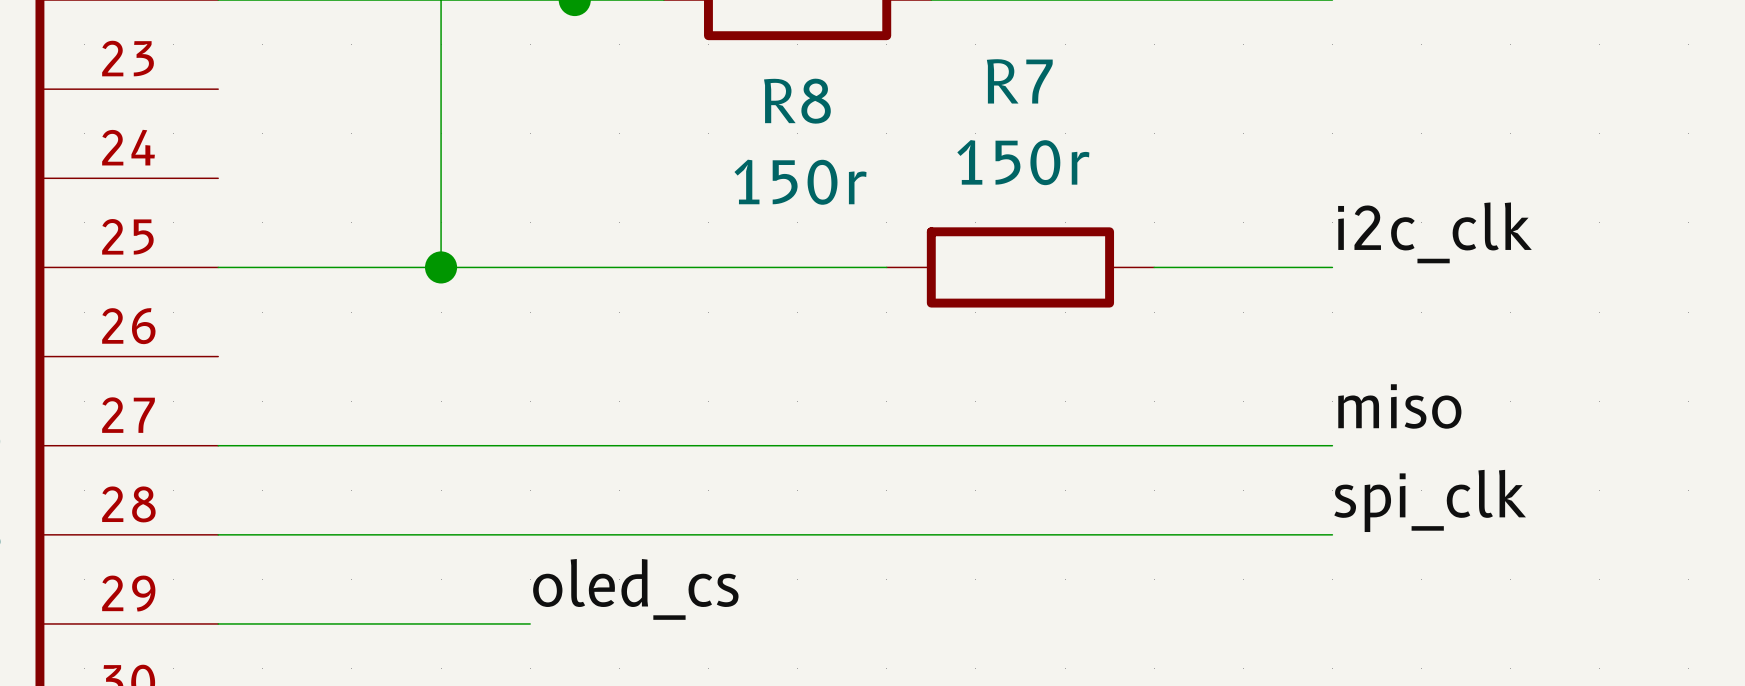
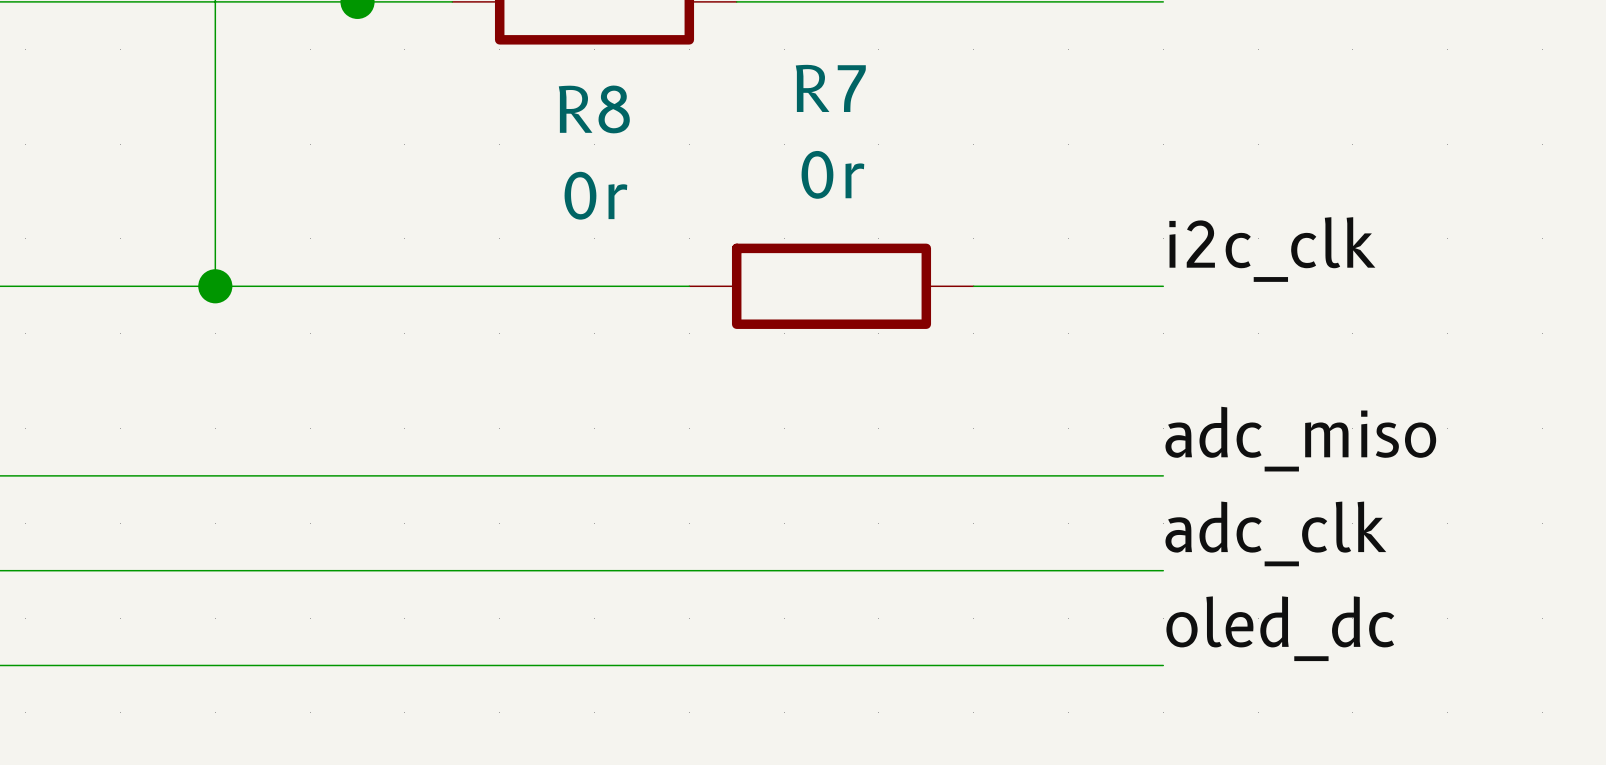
R7 value: 150r (1023, 162) -> 0r (832, 174)
R8 value: 150r (800, 182) -> 0r (595, 195)
label: miso (1399, 406) -> adc_miso (1300, 439)
label: spi_clk (1430, 500) -> adc_clk (1275, 533)
label: oled_cs (635, 589) -> none
label: none -> oled_dc (1280, 628)
wire: none -> (310, 665) (1163, 665)

